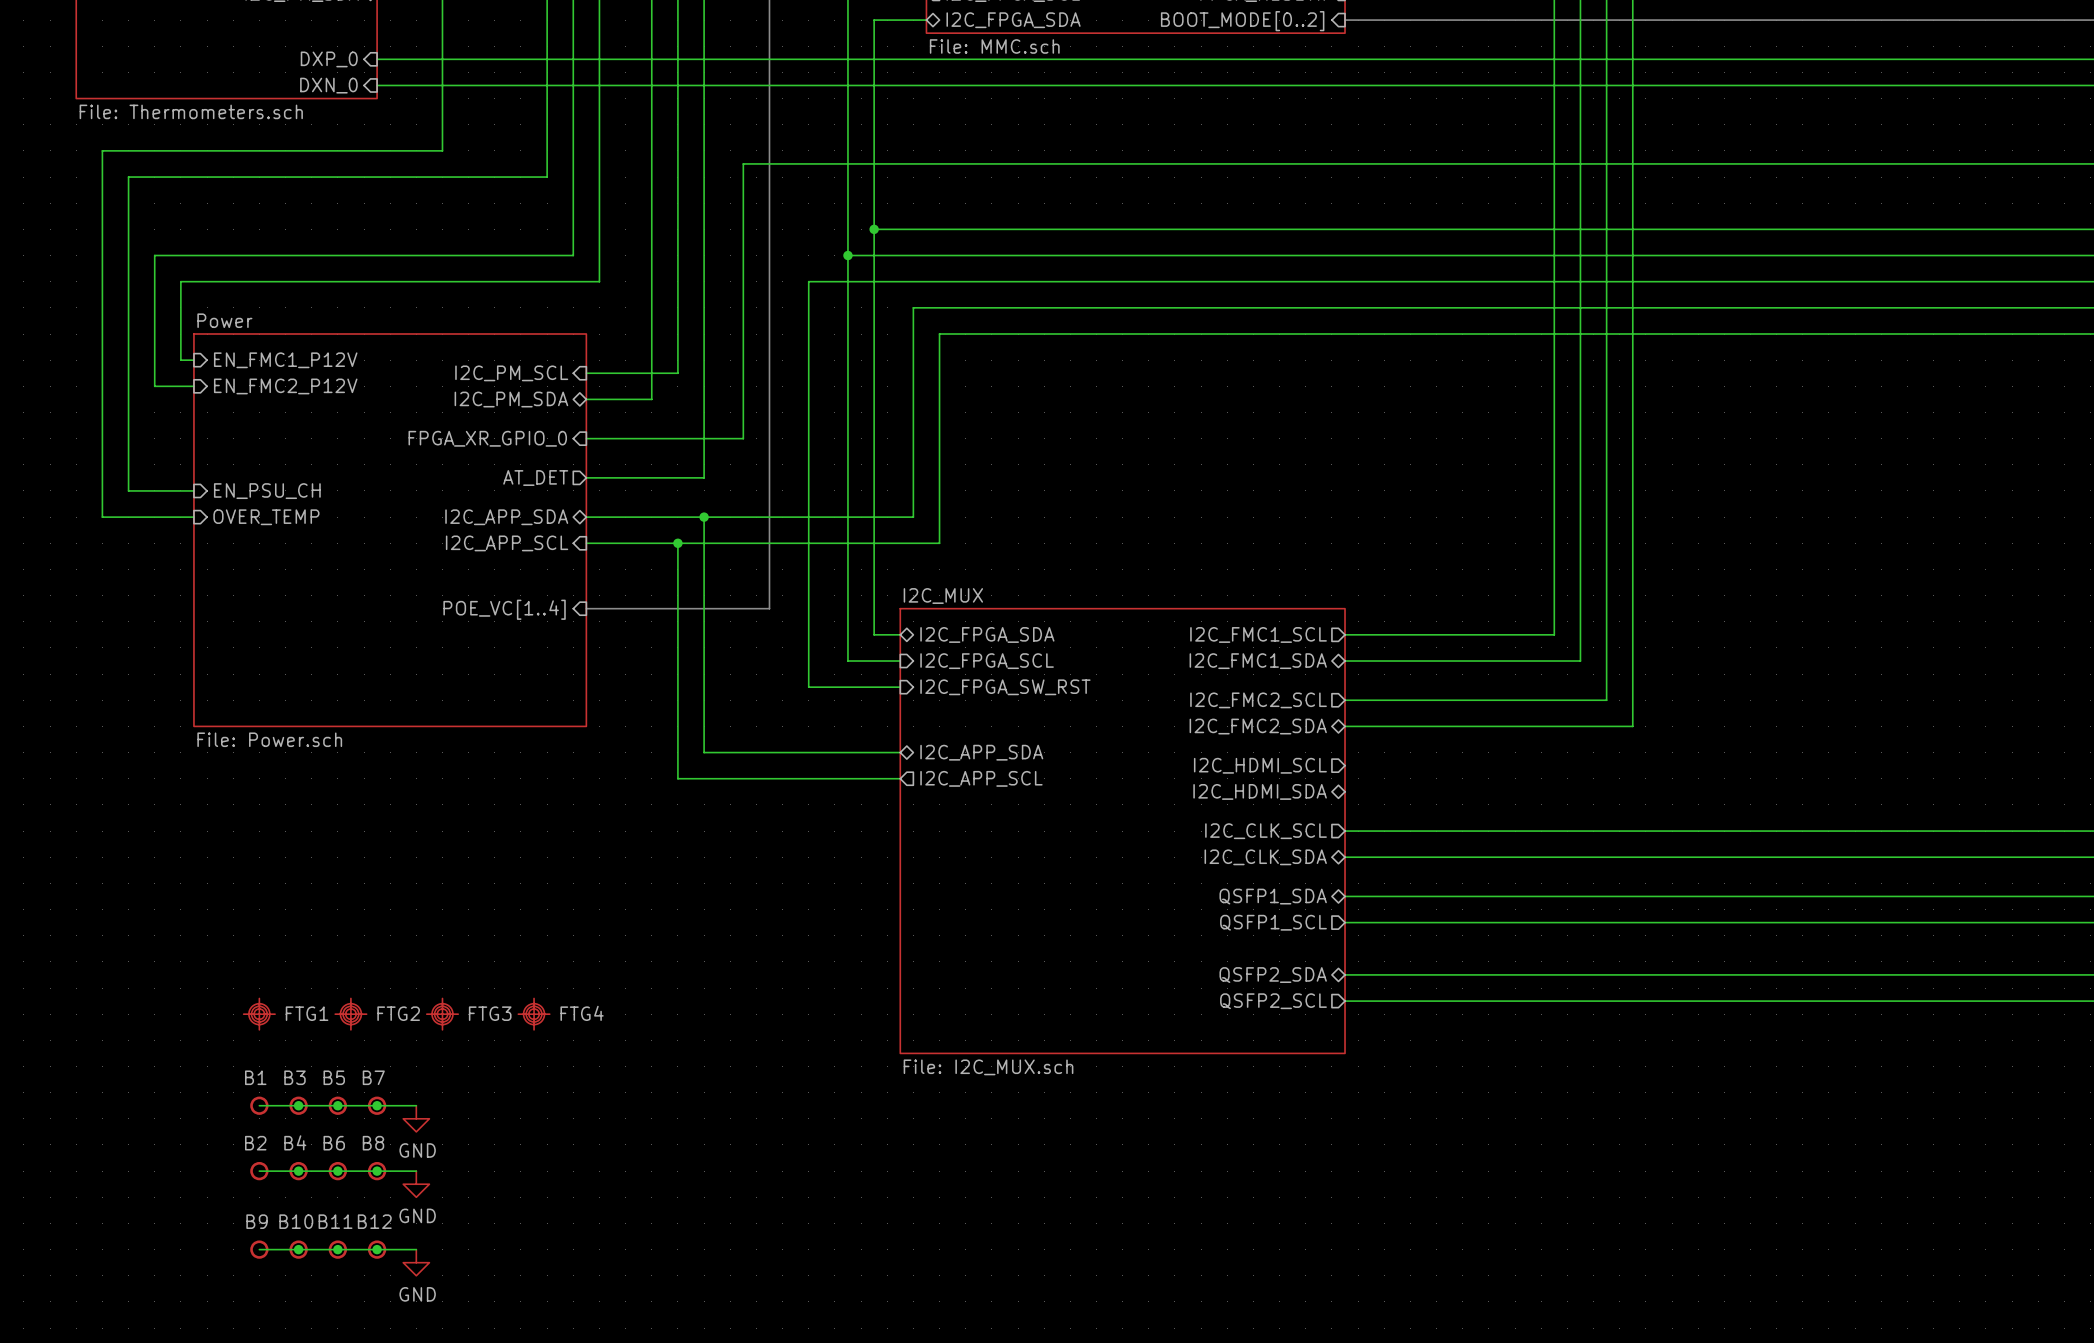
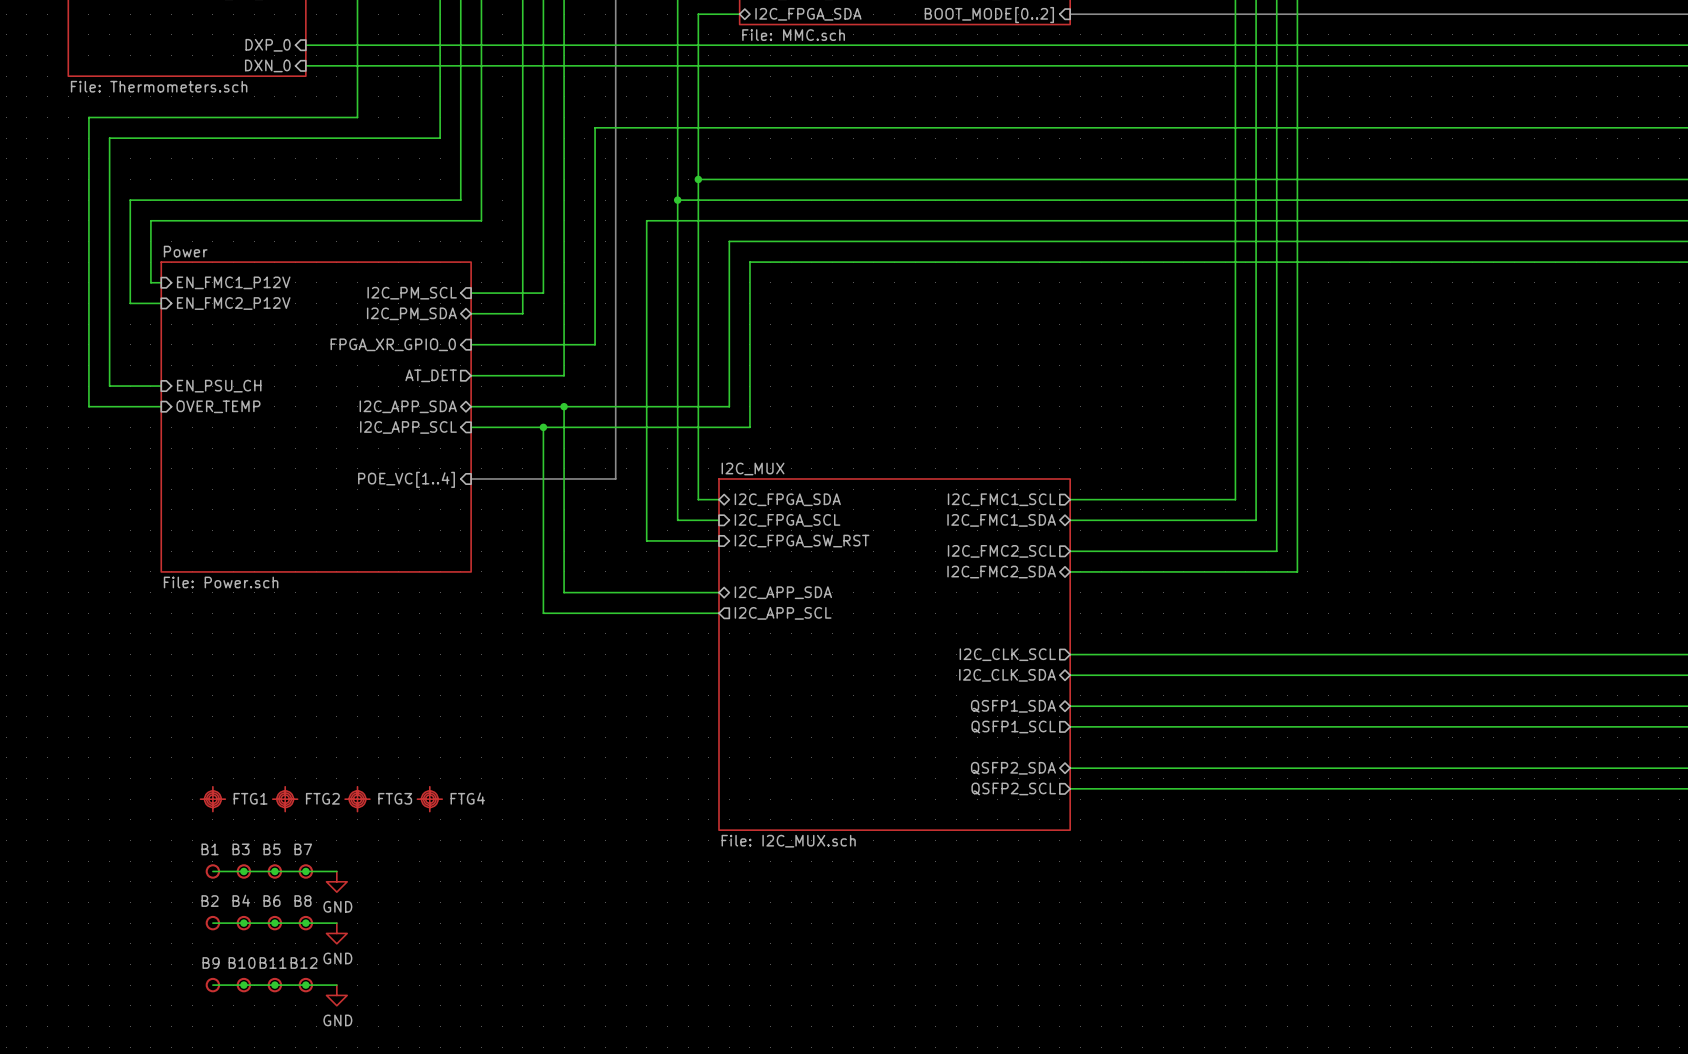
sheet pin: I2C_HDMI_SCL (1260, 765) -> none
sheet pin: I2C_HDMI_SDA (1260, 791) -> none

